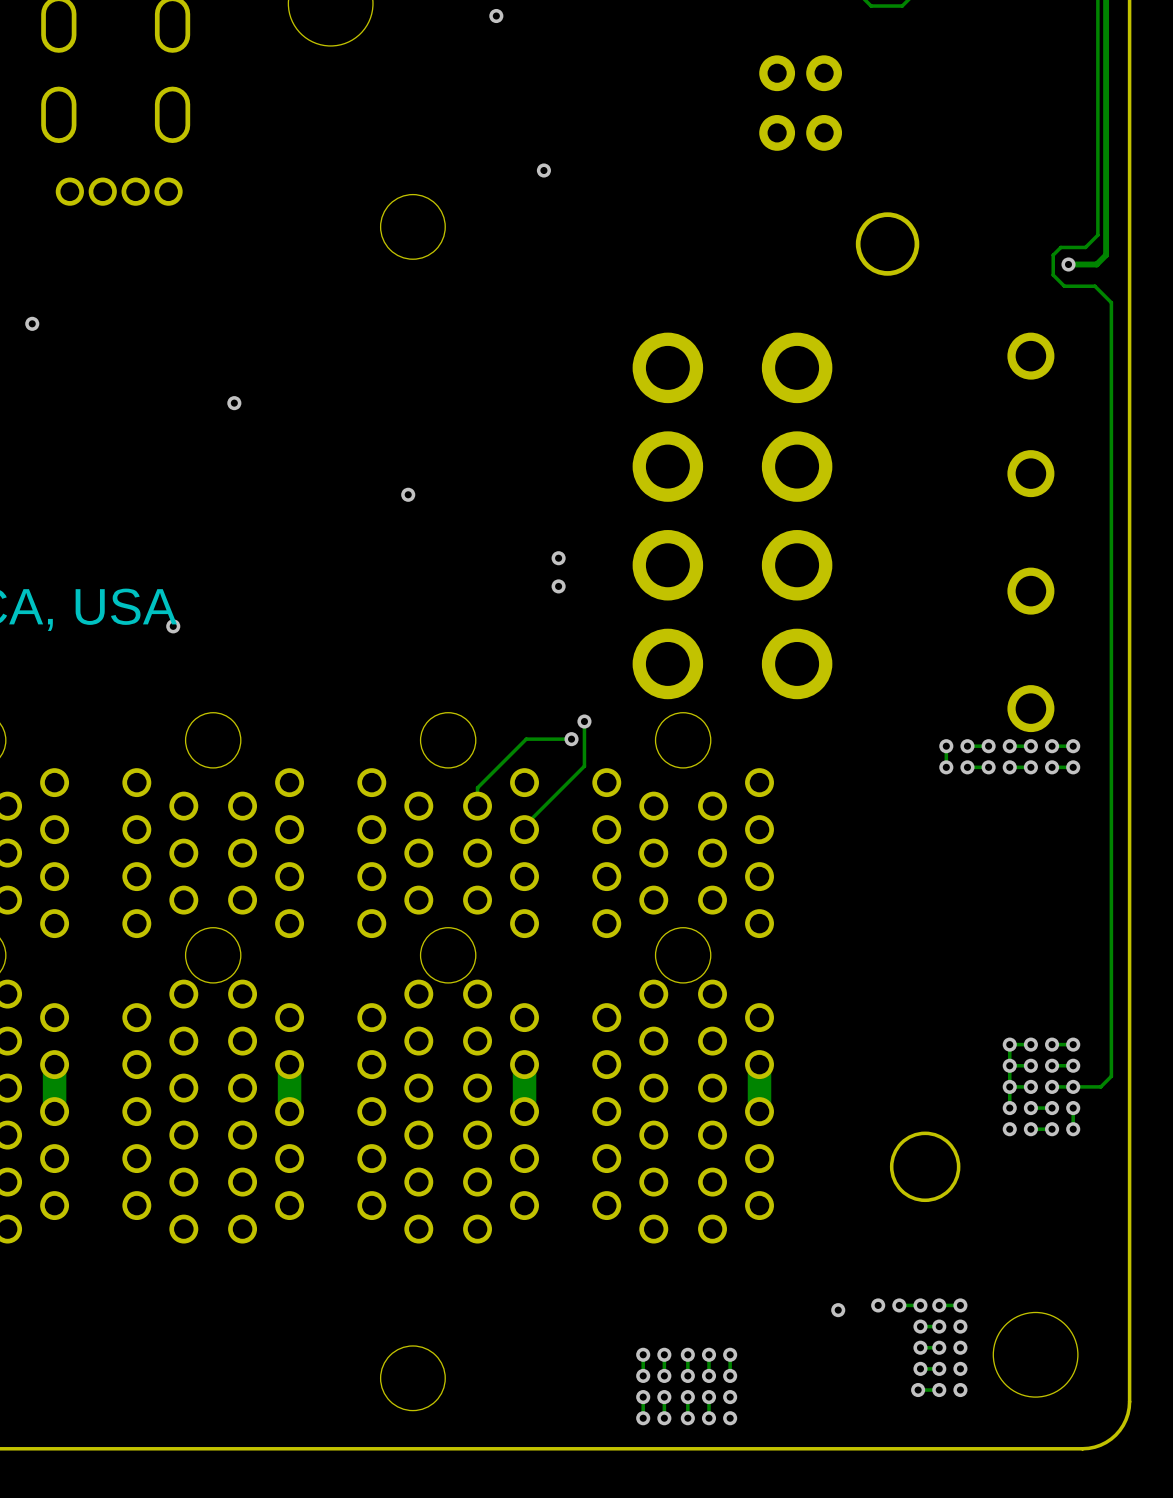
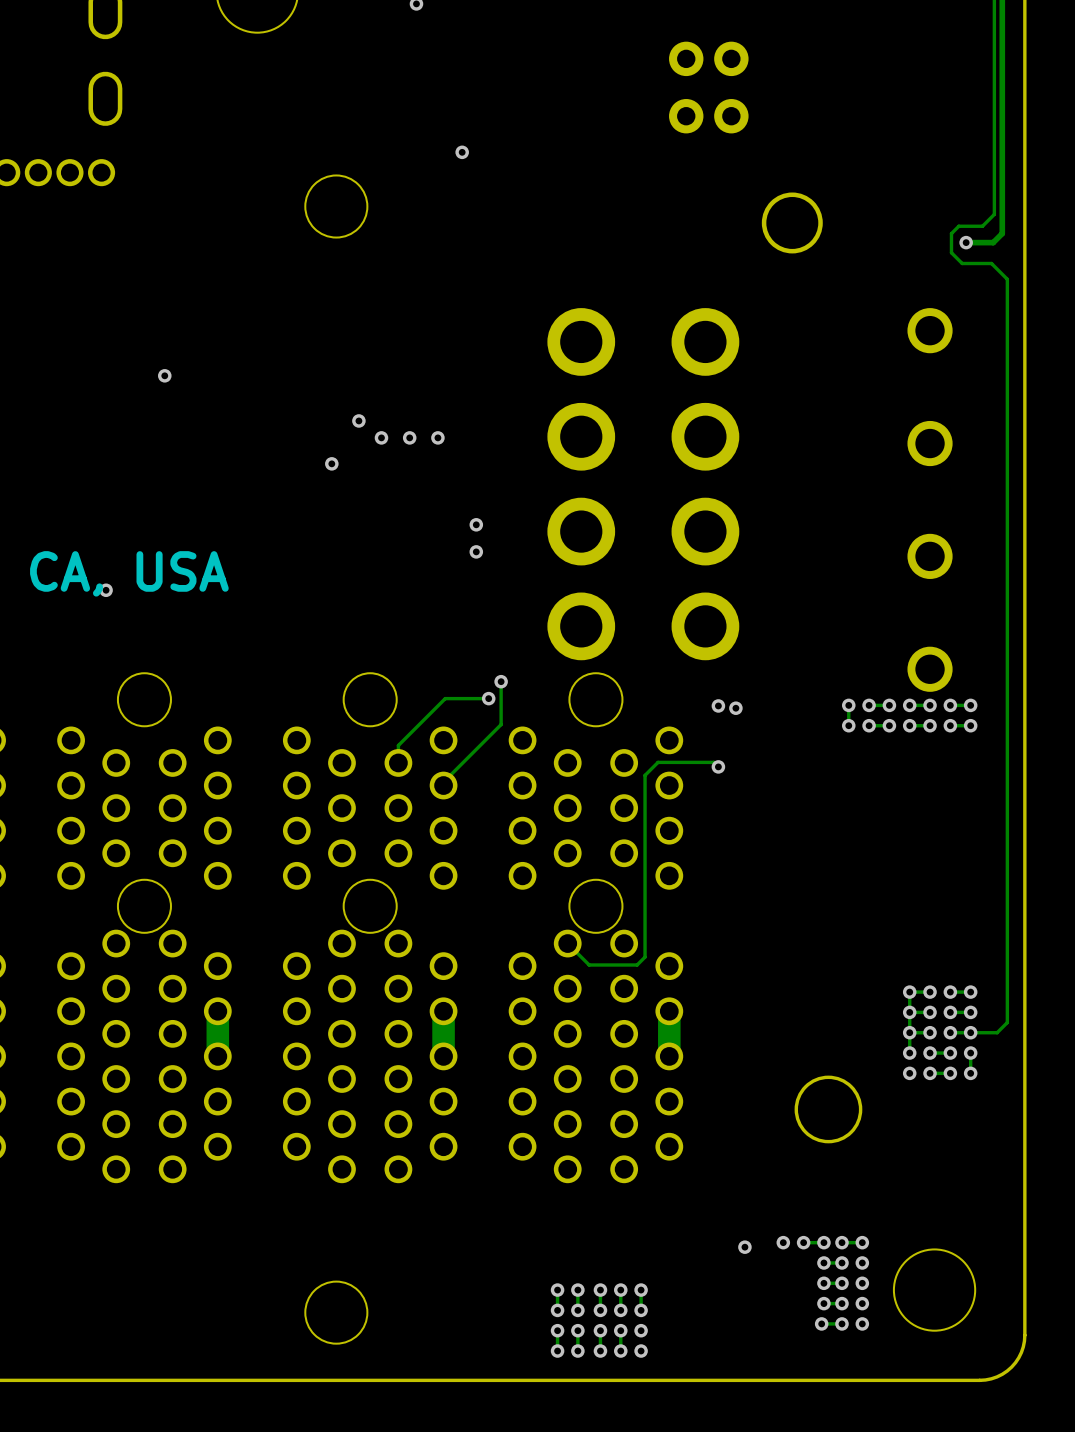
via: none -> (358, 420)
via: none -> (381, 437)
via: none -> (409, 437)
via: none -> (437, 437)
via: none -> (718, 705)
via: none -> (735, 708)
track: none -> (718, 766) (713, 762) (658, 762) (645, 775) (645, 957) (637, 965) (589, 965) (567, 943)
via: none -> (718, 766)

